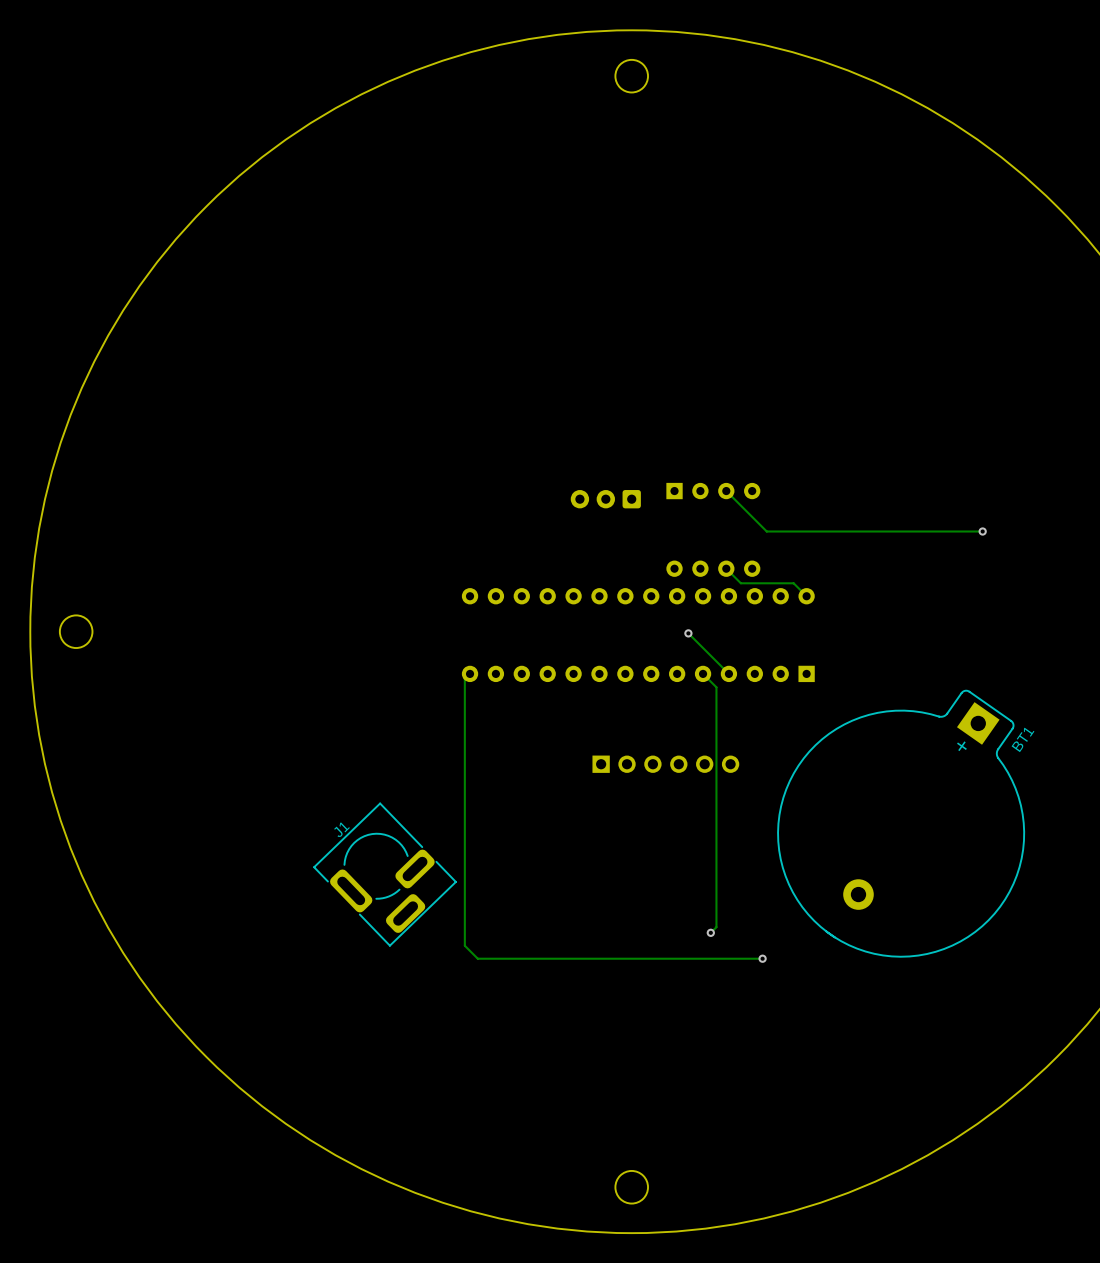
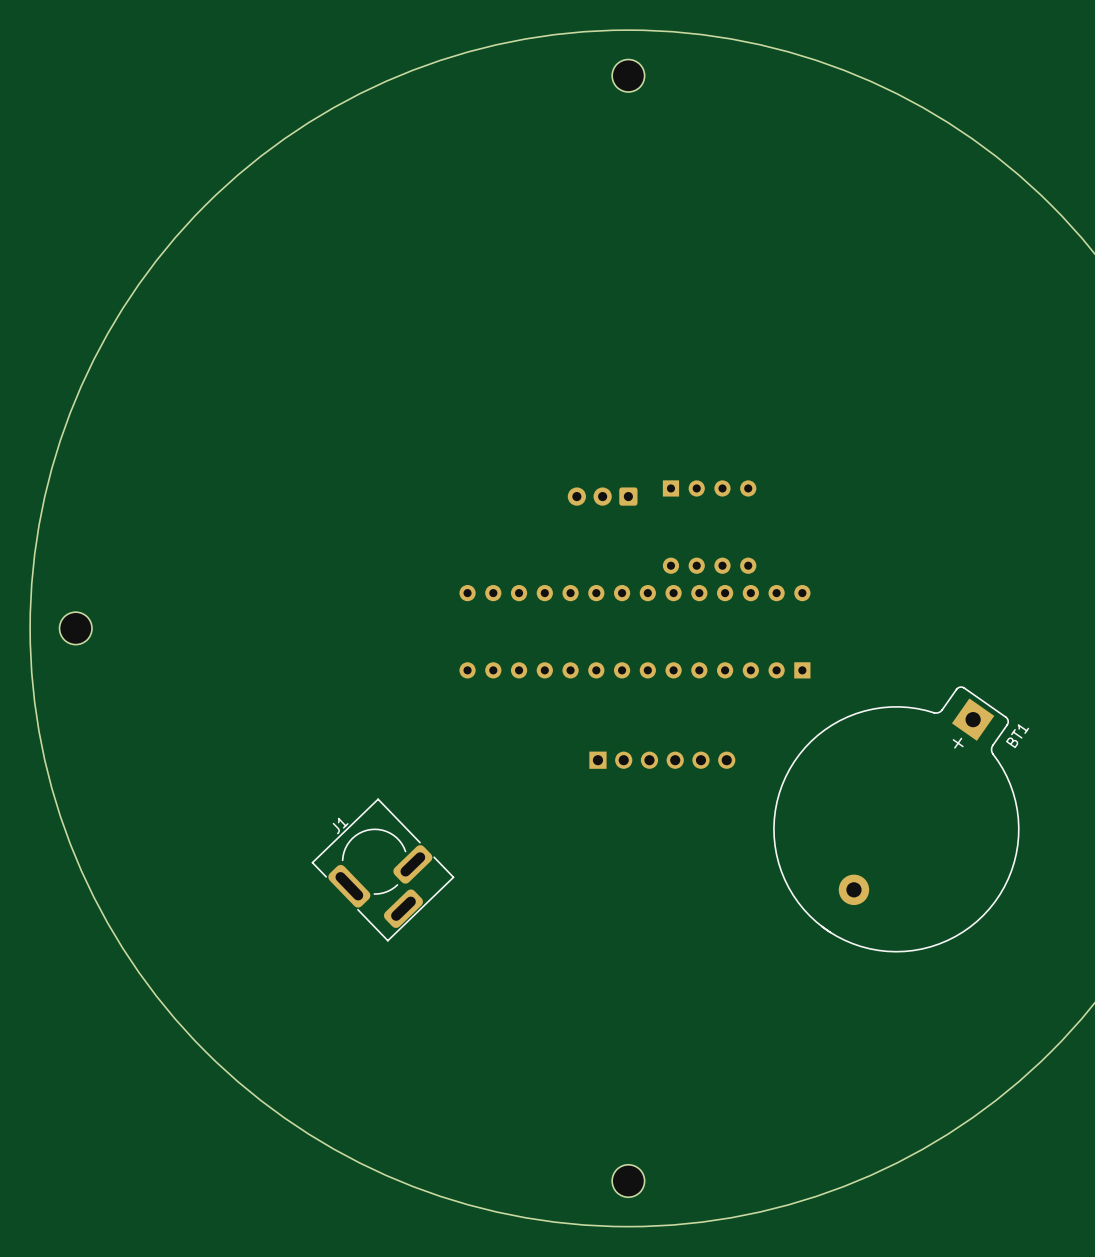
track: (726, 491) (766, 531) (982, 531) -> none
via: (982, 531) -> none
track: (726, 568) (740, 583) (793, 583) (806, 596) -> none
track: (688, 633) (728, 673) -> none
via: (688, 633) -> none
track: (470, 673) (464, 679) (464, 945) (477, 958) (762, 958) -> none
track: (703, 673) (716, 687) (716, 927) (710, 932) -> none
via: (710, 932) -> none
via: (762, 958) -> none

